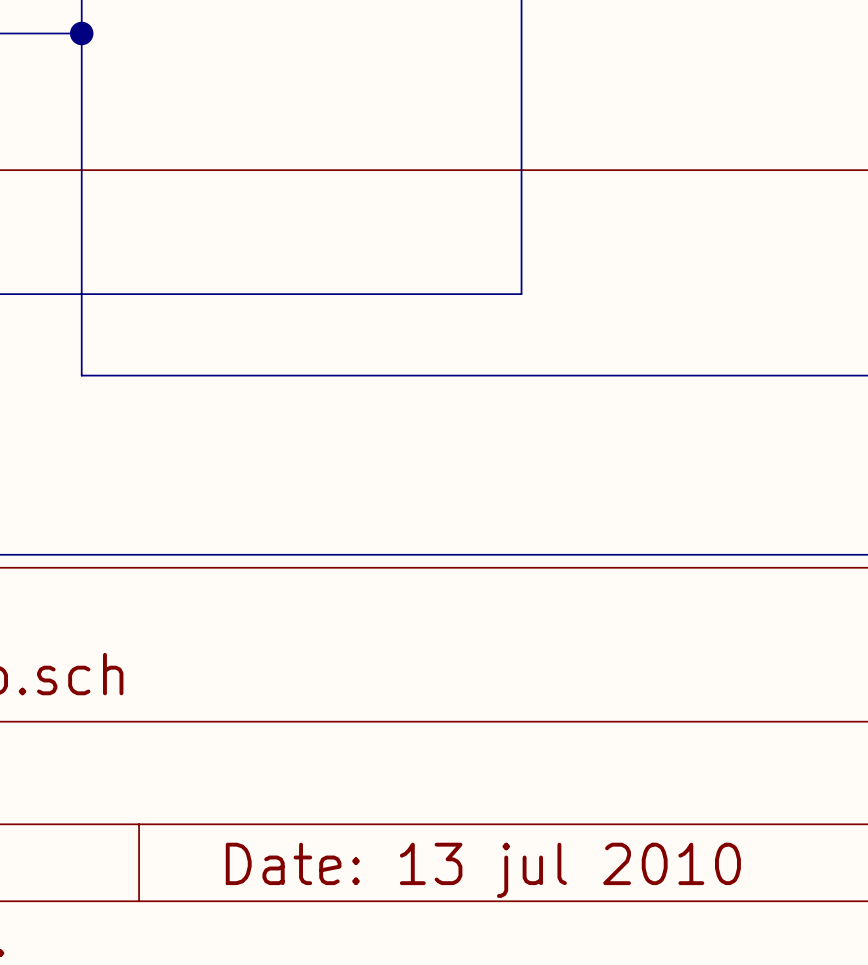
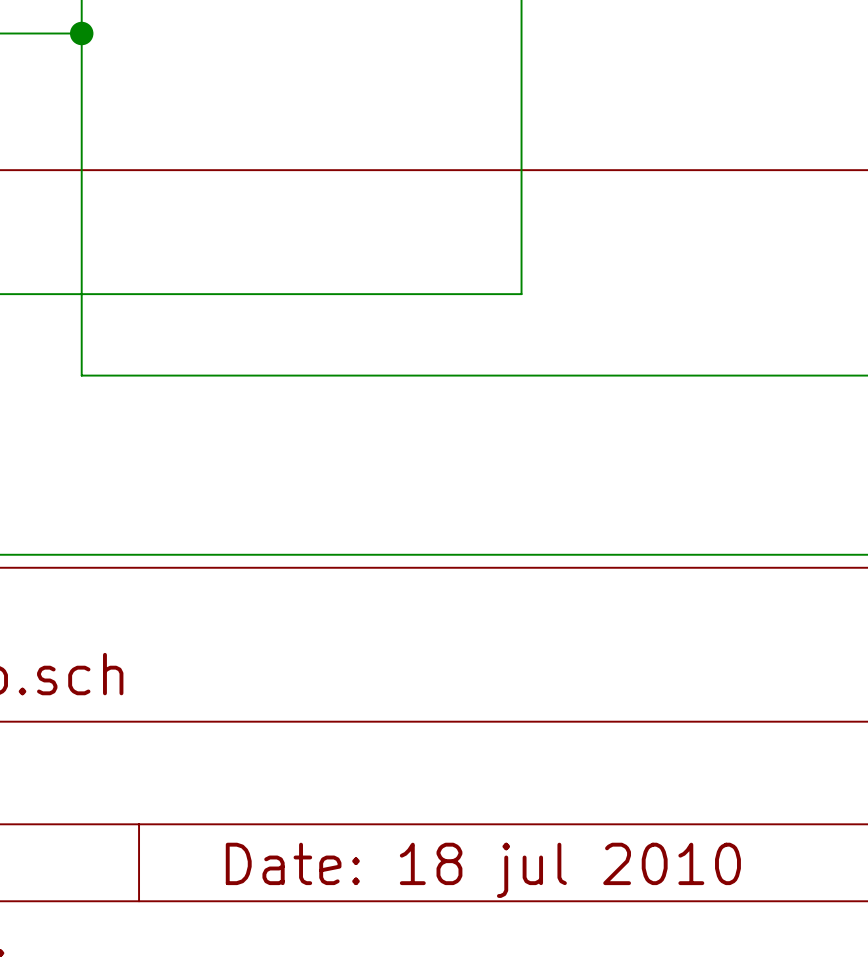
title block: Date: 13 jul 2010 (483, 870) -> Date: 18 jul 2010 (483, 870)

